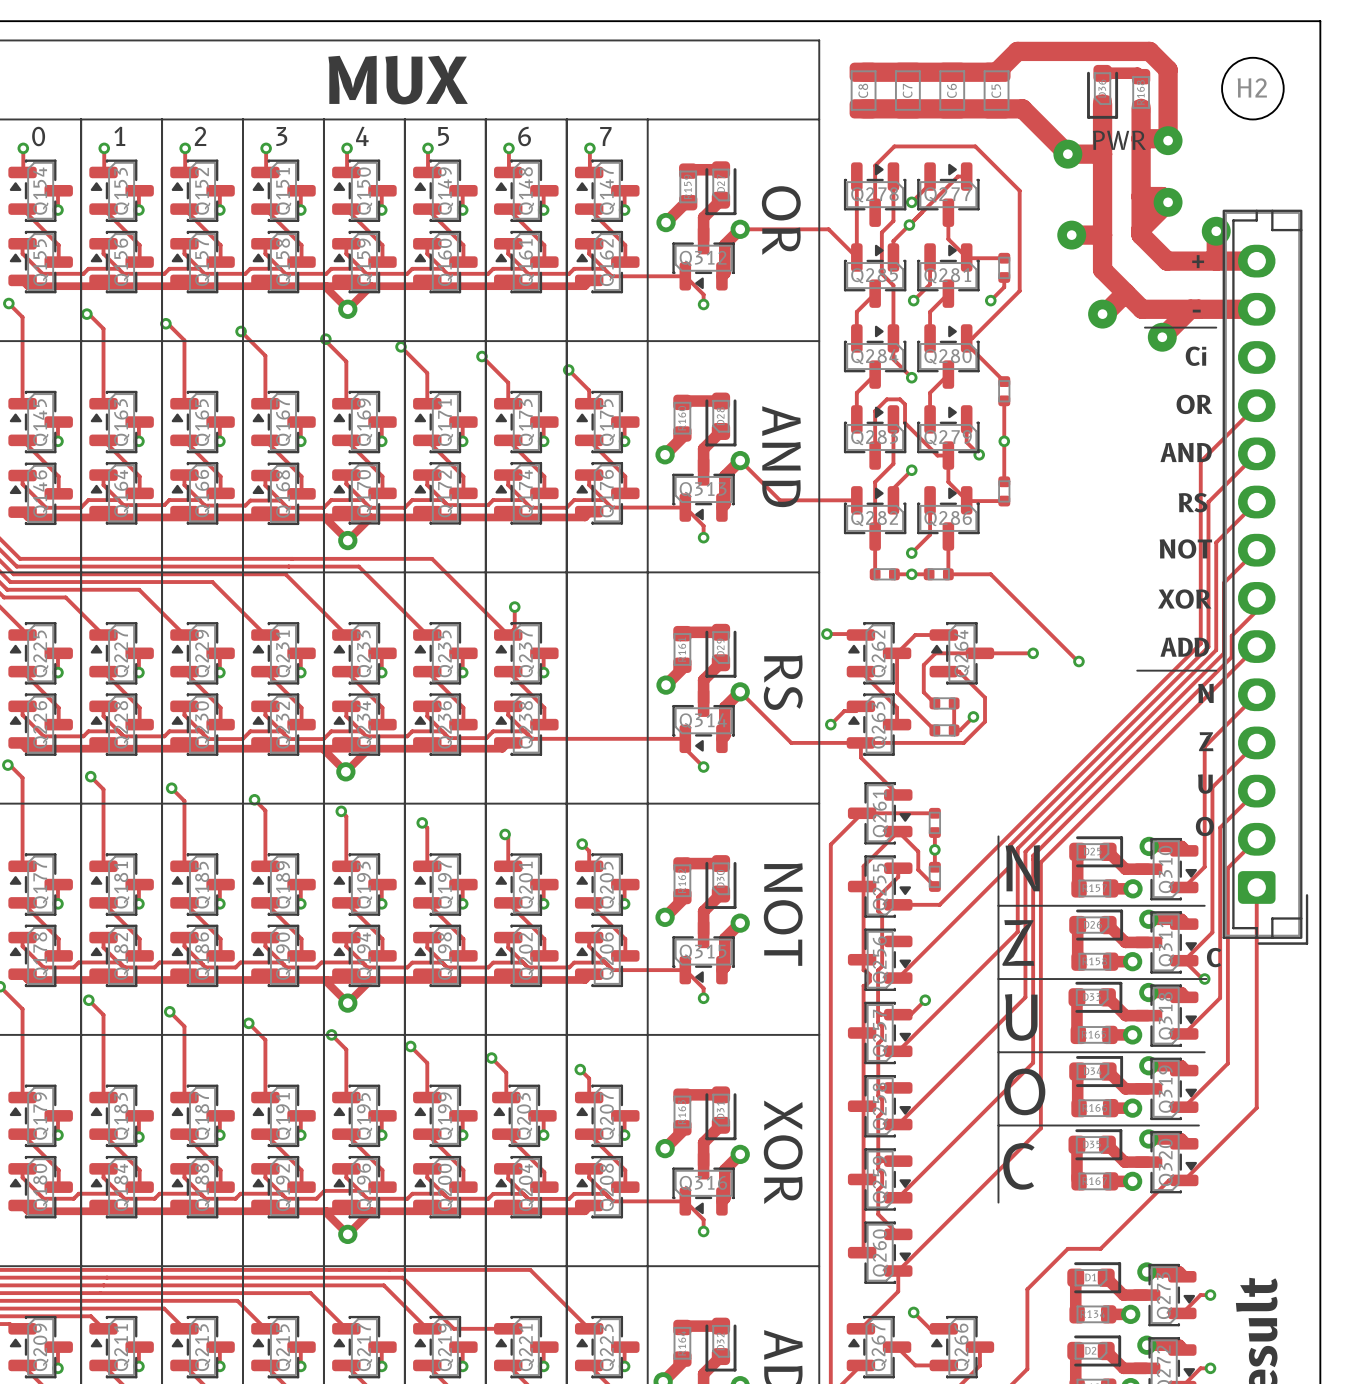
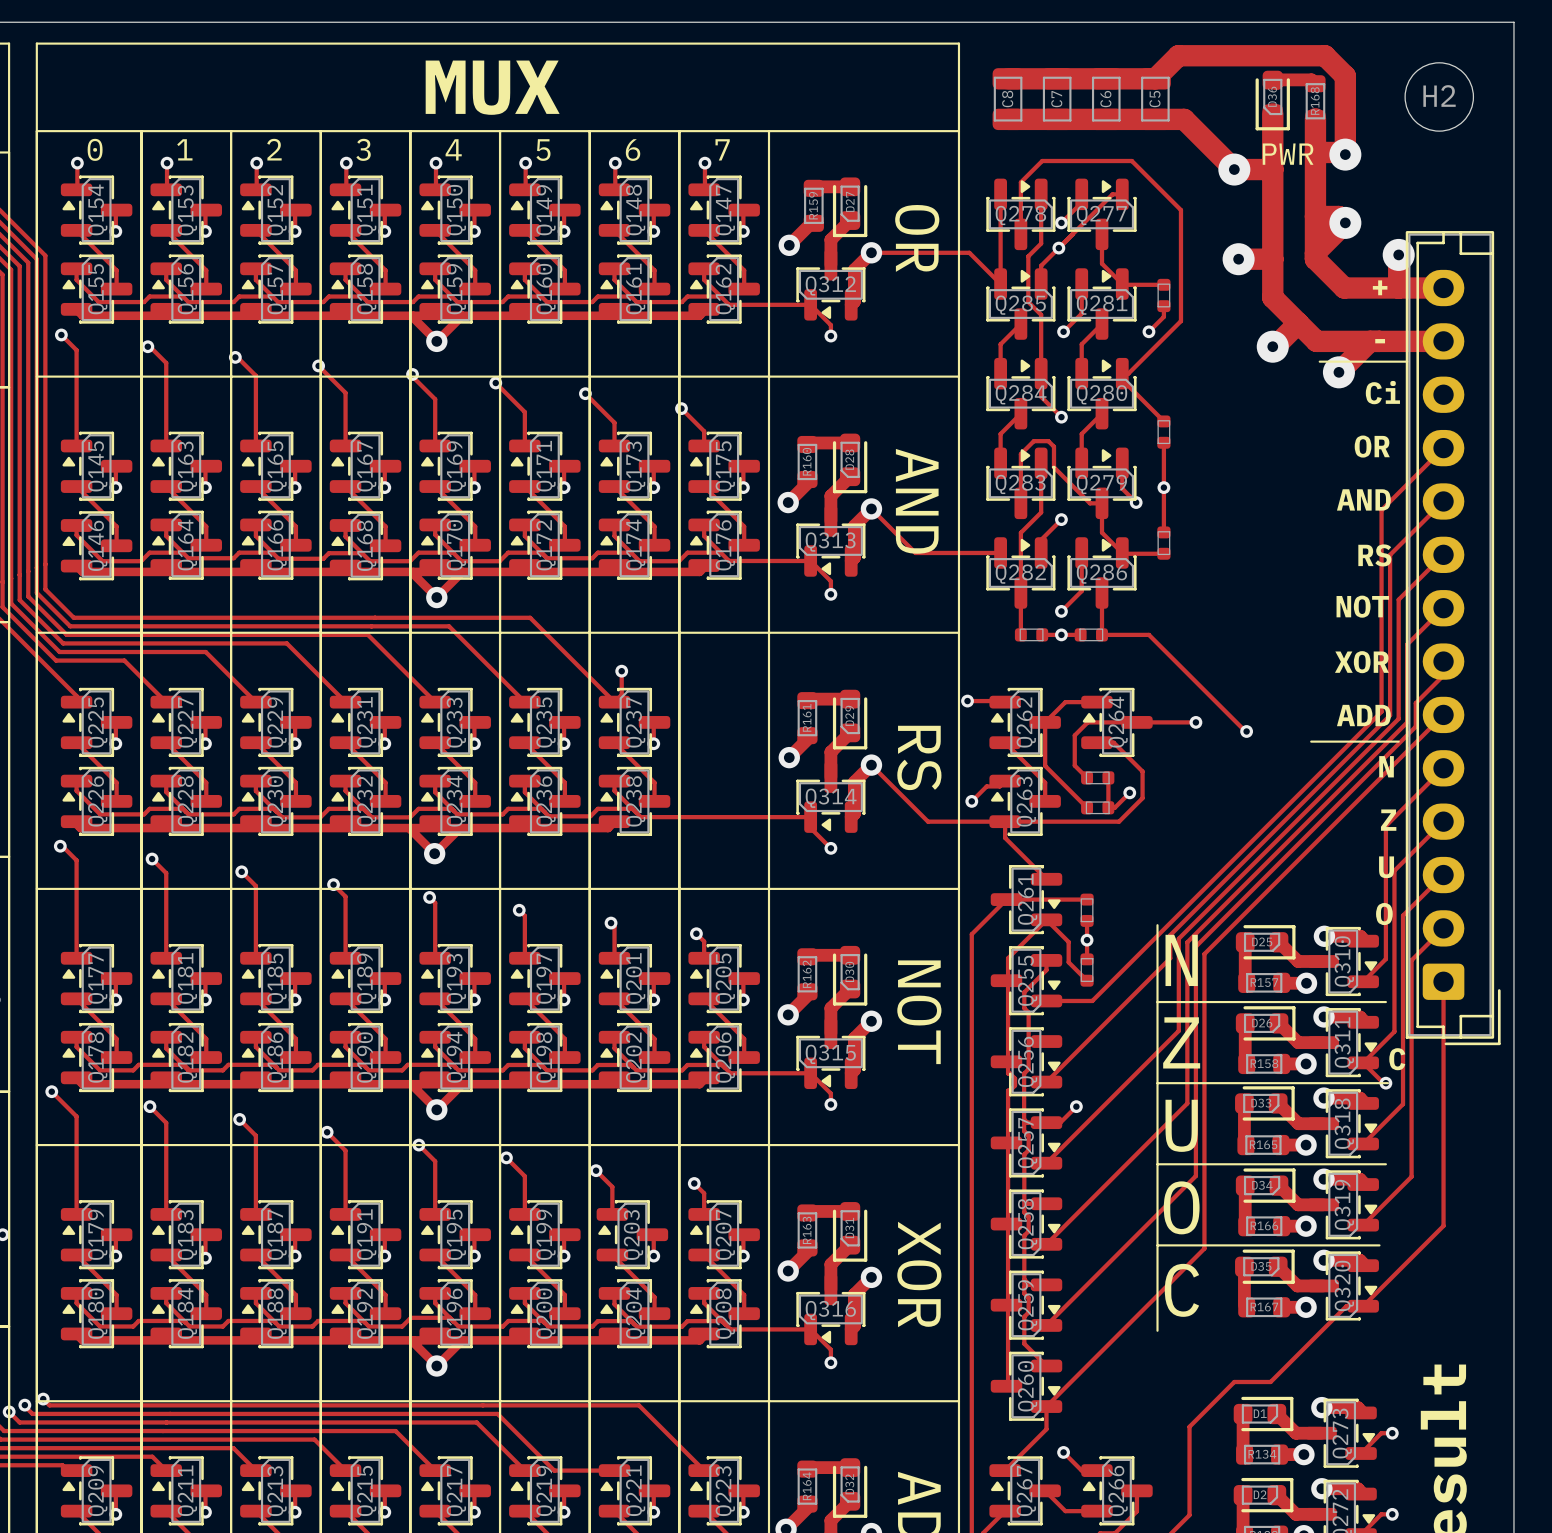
line: none -> (1398, 361) (1407, 361)

